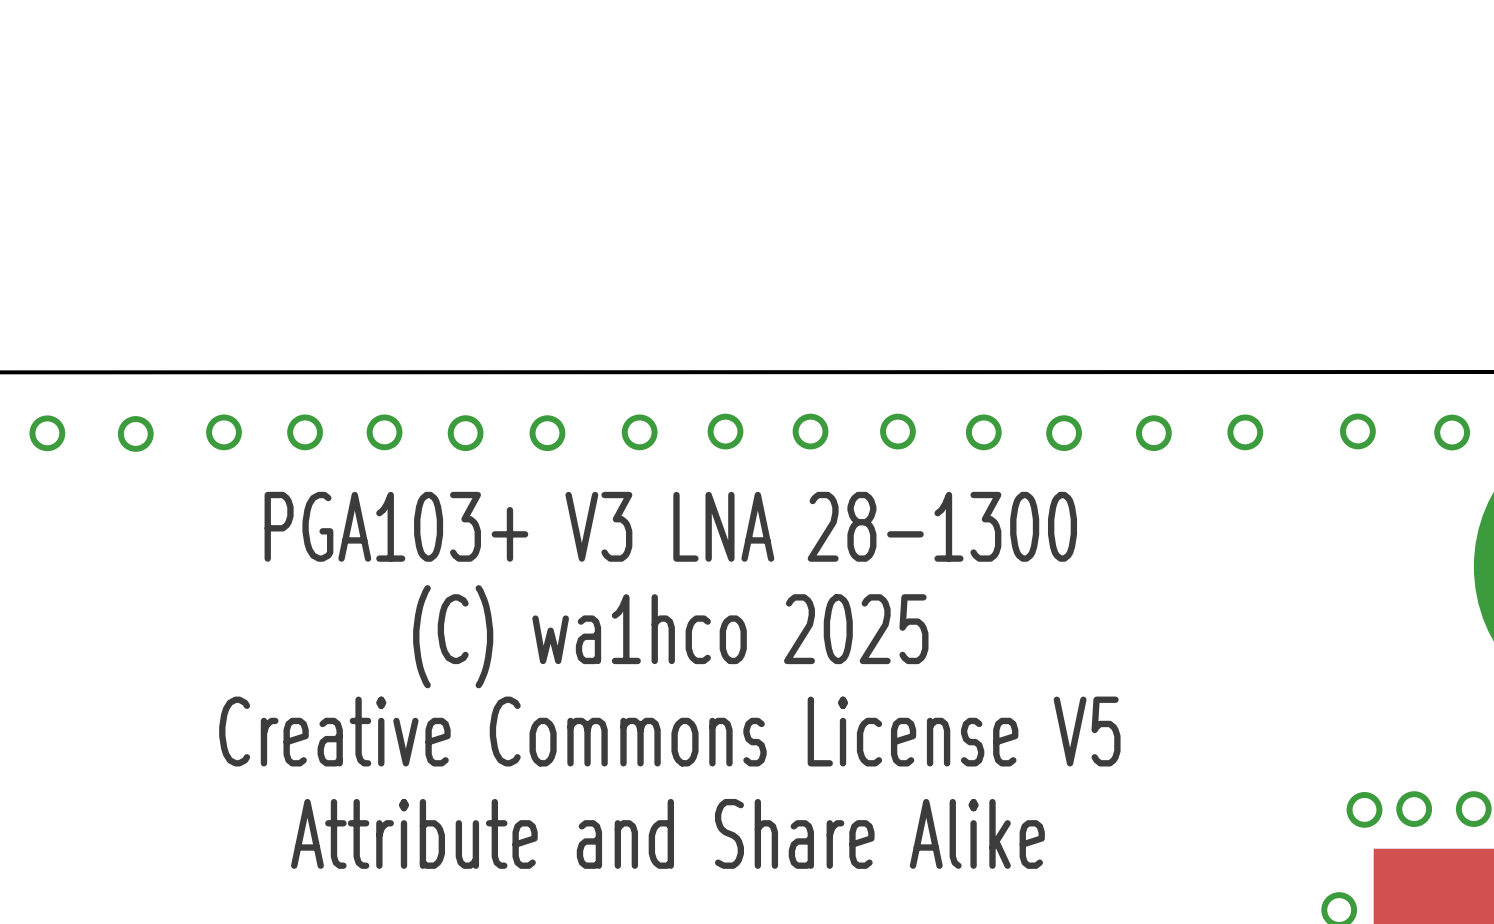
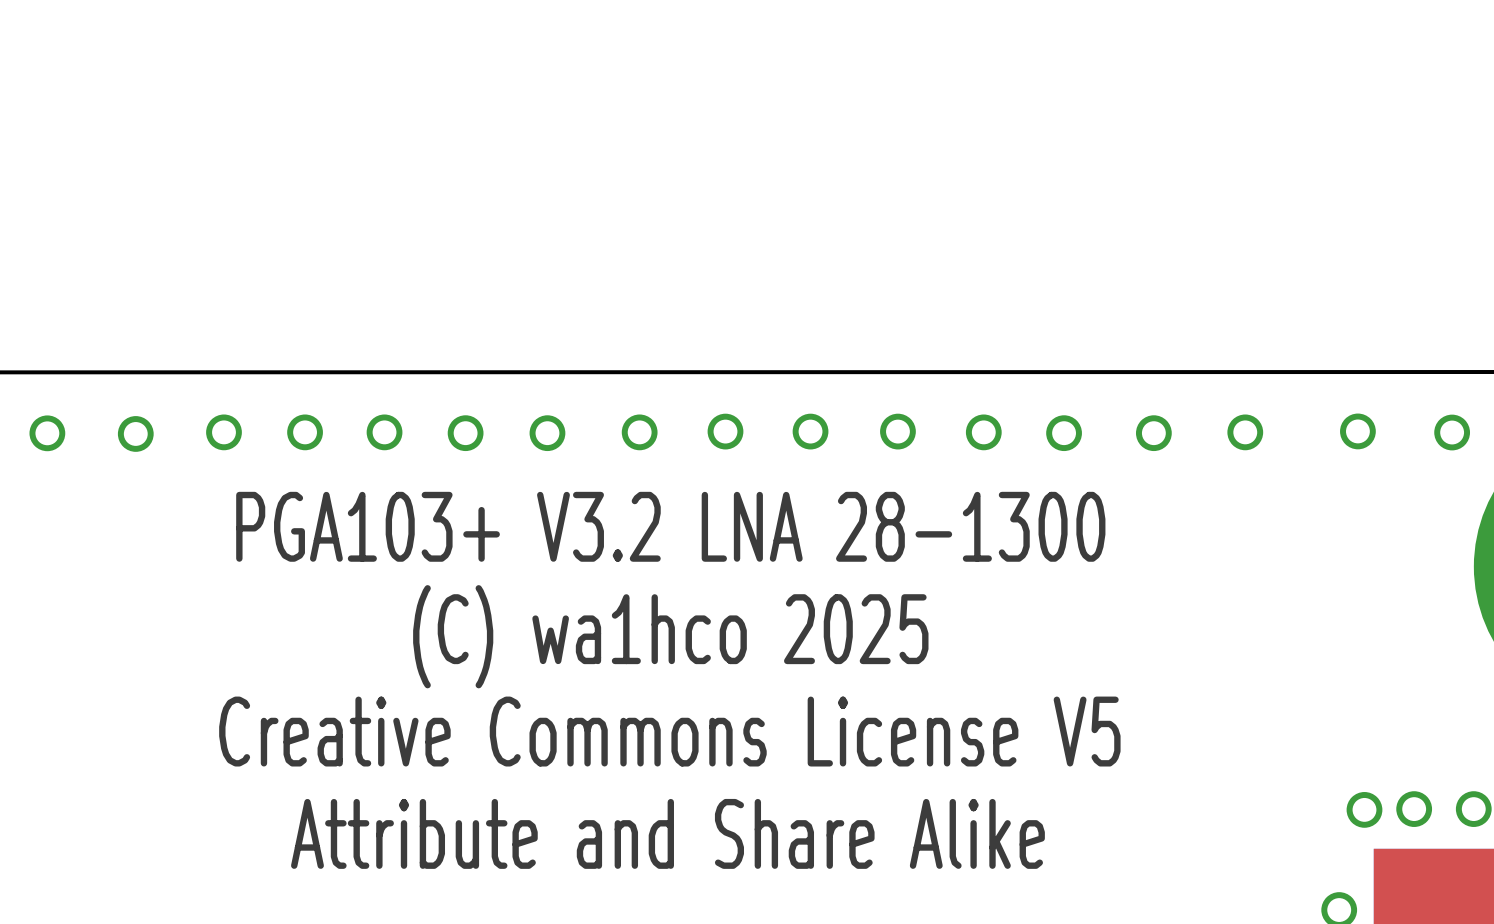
text: PGA103+ V3 LNA 28-1300 (670, 526) -> PGA103+ V3.2 LNA 28-1300 (670, 526)

